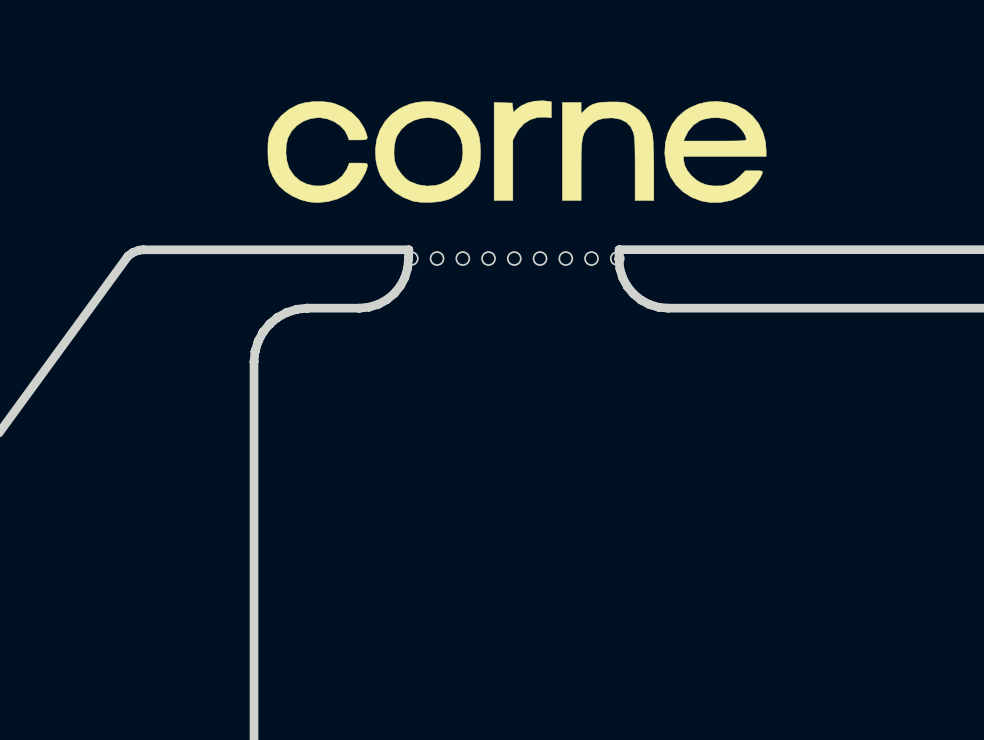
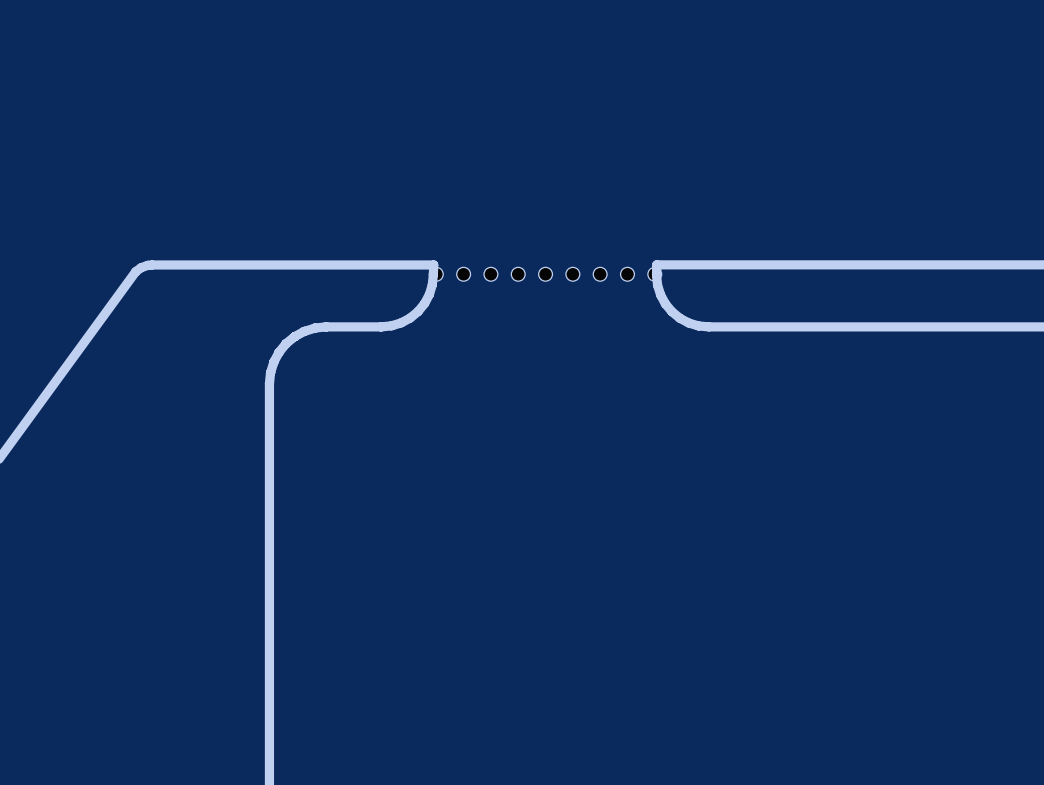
drawing: [267, 100, 767, 203] -> none

